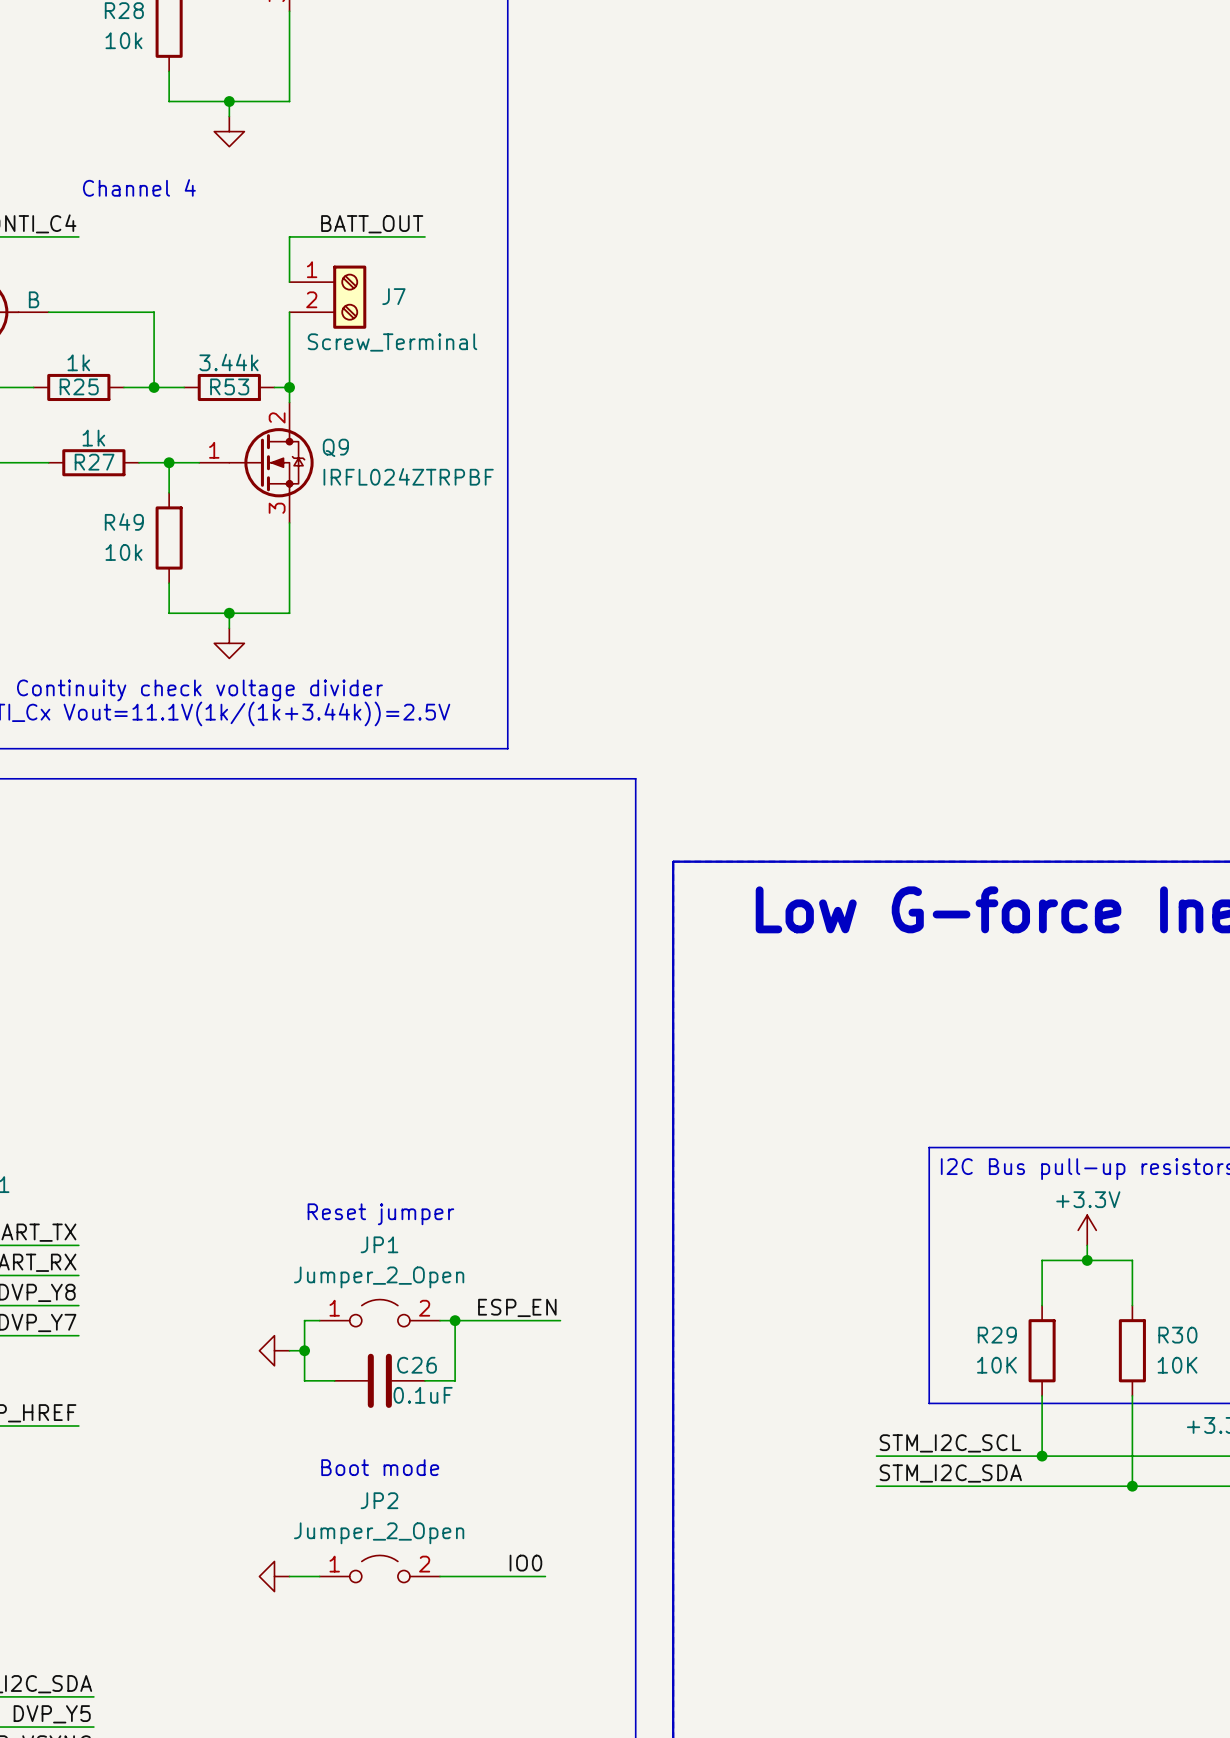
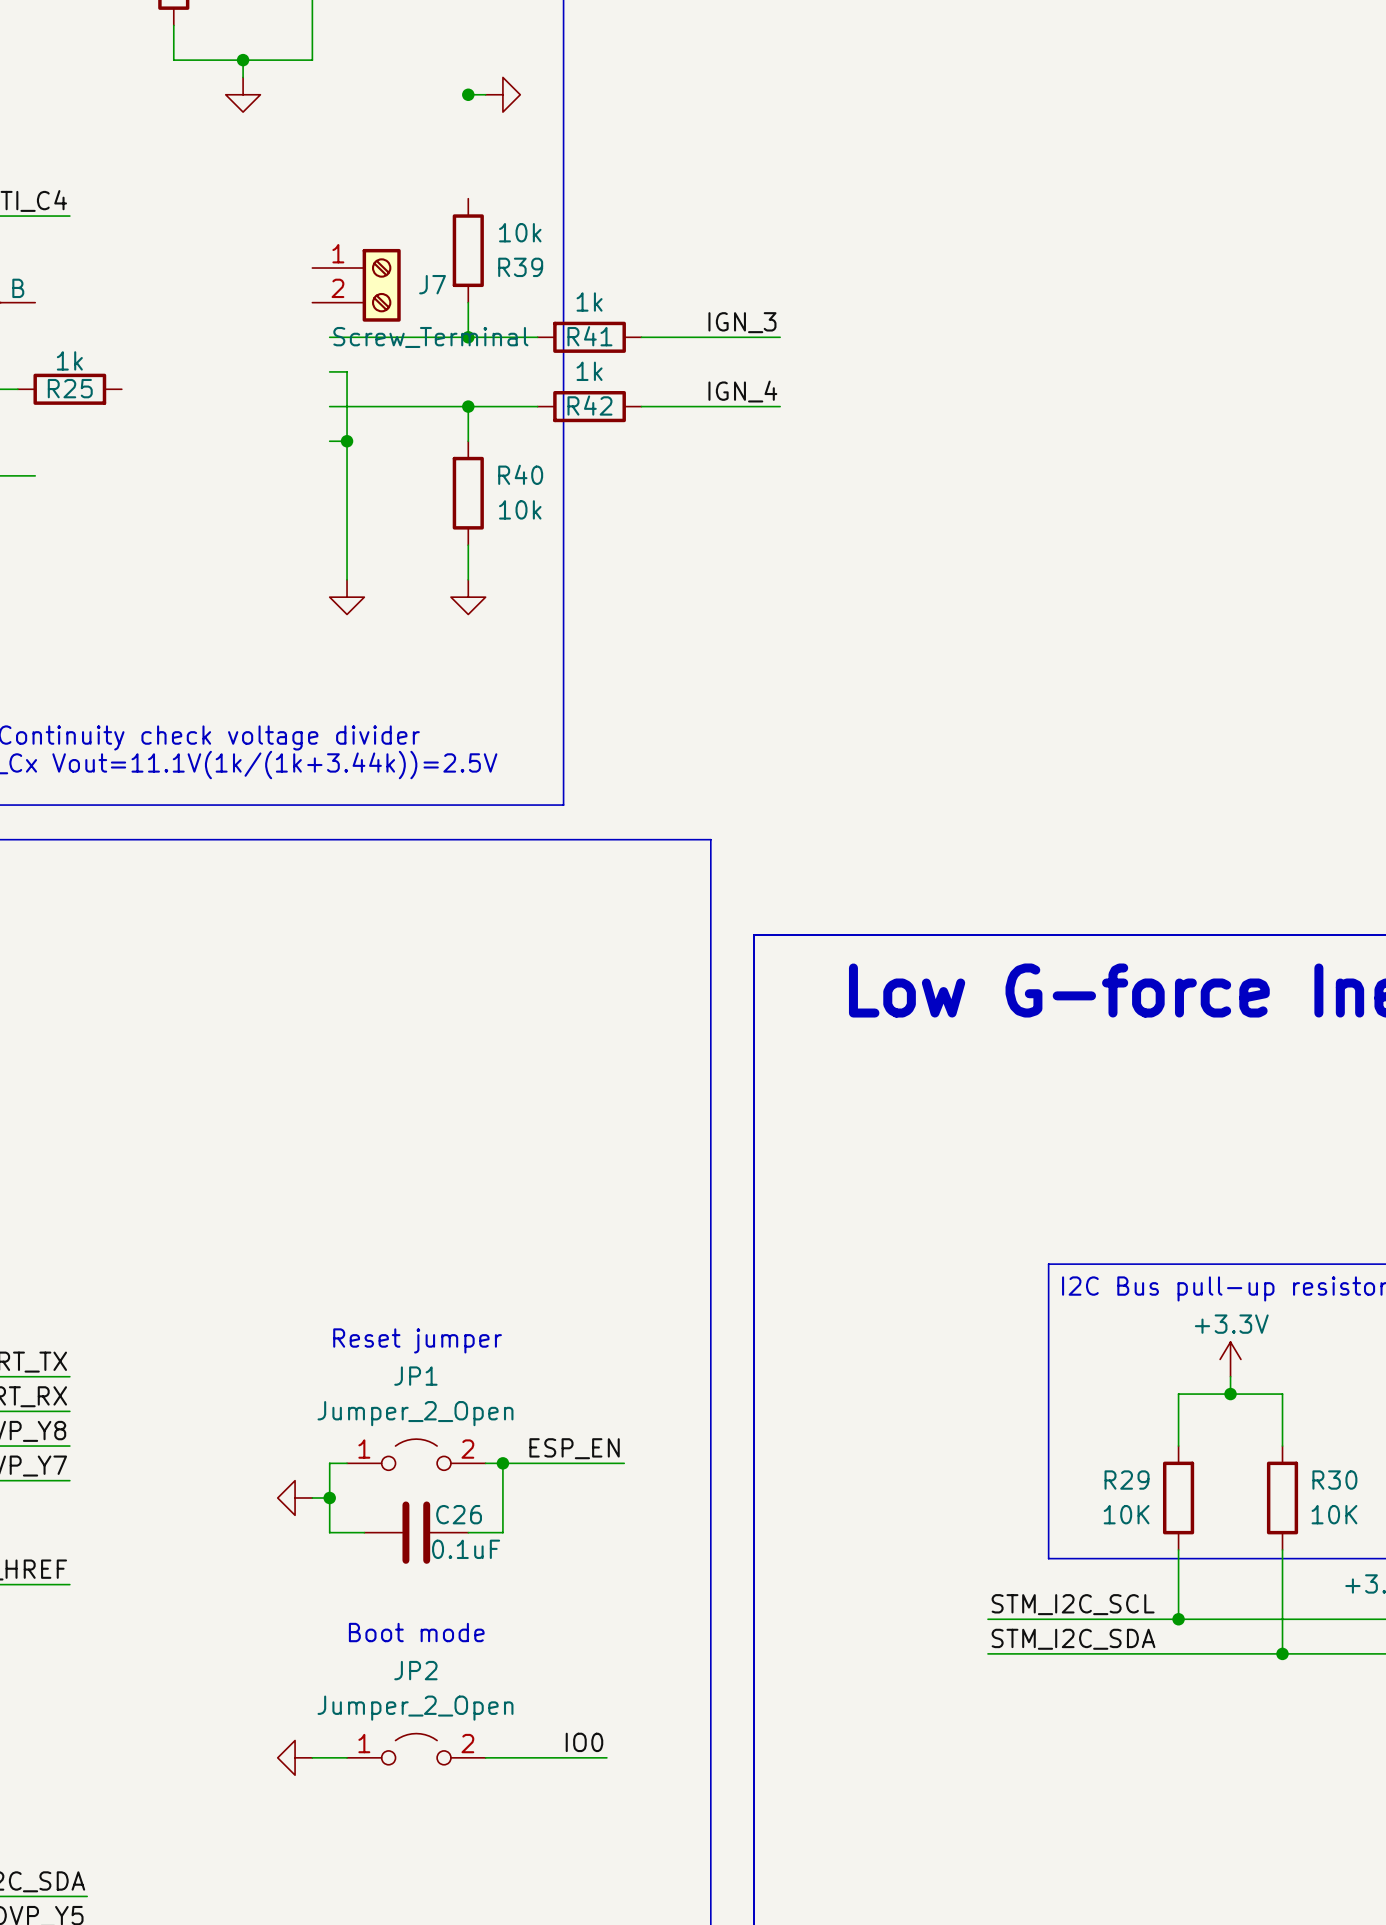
wire: none -> (468, 94) (485, 94)
junction: none -> (468, 94)
power symbol: none -> (502, 94)
text: Channel 4 (139, 187) -> none
label: BATT_OUT (372, 224) -> none
wire: (424, 236) (289, 236) (289, 282) -> none
R39: none -> 10k (468, 250)
wire: (48, 312) (154, 312) (154, 387) -> none
wire: (289, 312) (289, 402) -> none
wire: none -> (468, 302) (468, 337)
label: none -> IGN_3 (742, 322)
wire: none -> (329, 337) (537, 337)
junction: none -> (468, 337)
R41: none -> 1k (589, 337)
wire: none -> (641, 337) (780, 337)
wire: none -> (329, 371) (347, 371) (347, 579)
wire: (123, 387) (184, 387) -> none
junction: (154, 387) -> none
R53: 3.44k (229, 387) -> none
wire: (274, 387) (289, 387) -> (329, 441) (347, 441)
junction position: (289, 387) -> (347, 441)
label: none -> IGN_4 (742, 391)
wire: none -> (329, 406) (537, 406)
junction: none -> (468, 406)
R42: none -> 1k (589, 406)
wire: none -> (641, 406) (780, 406)
R27: 1k (93, 462) -> none
wire: (139, 462) (199, 462) -> none
wire: (169, 462) (169, 492) -> (468, 406) (468, 441)
junction: (169, 462) -> none
Q9: IRFL024ZTRPBF (256, 462) -> none
R40: none -> 10k (468, 493)
wire: (289, 522) (289, 613) (169, 613) (169, 583) -> none
wire: none -> (468, 545) (468, 579)
R49: 10k (169, 537) -> none
power symbol: none -> (347, 597)
power symbol: none -> (468, 597)
wire: (229, 613) (229, 628) -> none
junction: (229, 613) -> none
power symbol: (229, 643) -> none

